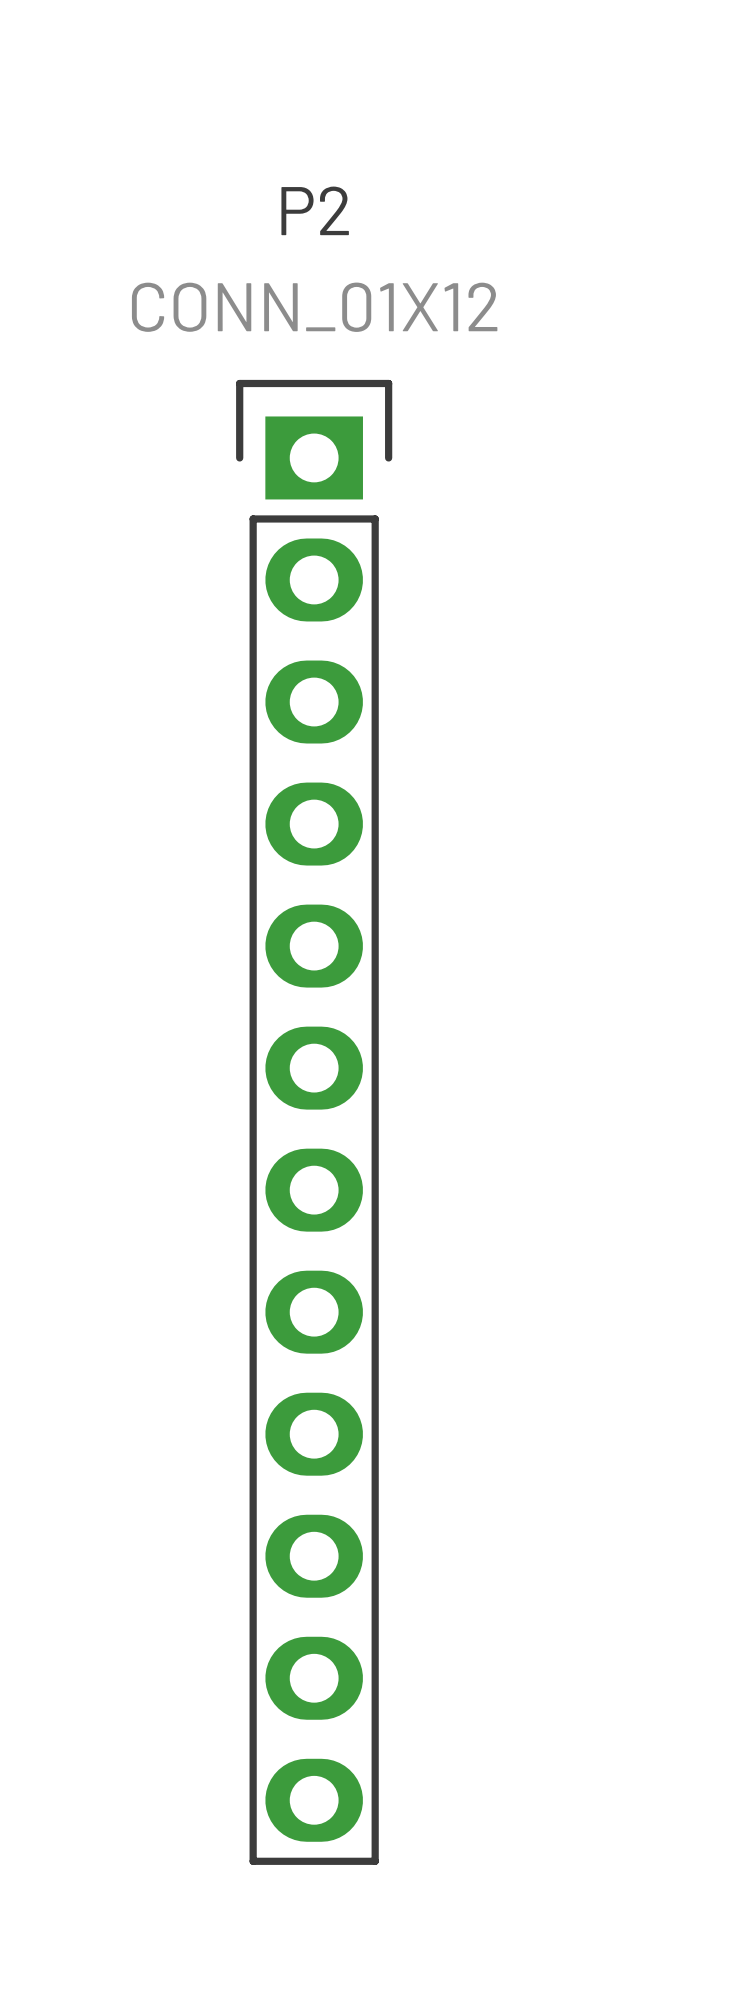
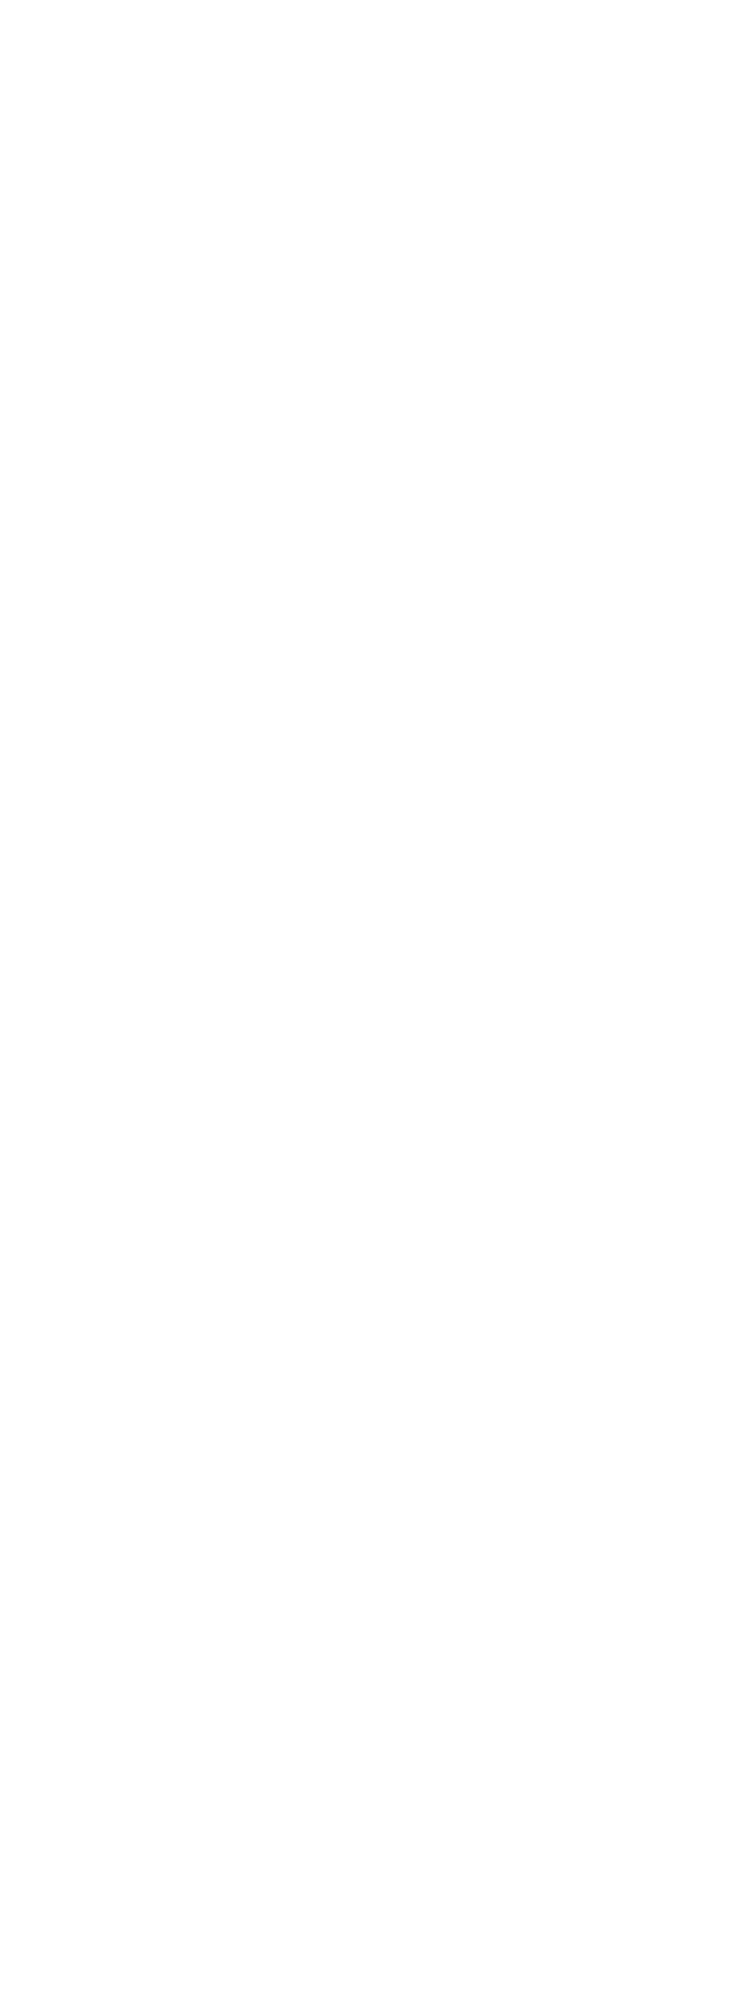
P2: CONN_01X12 (314, 1122) -> none

